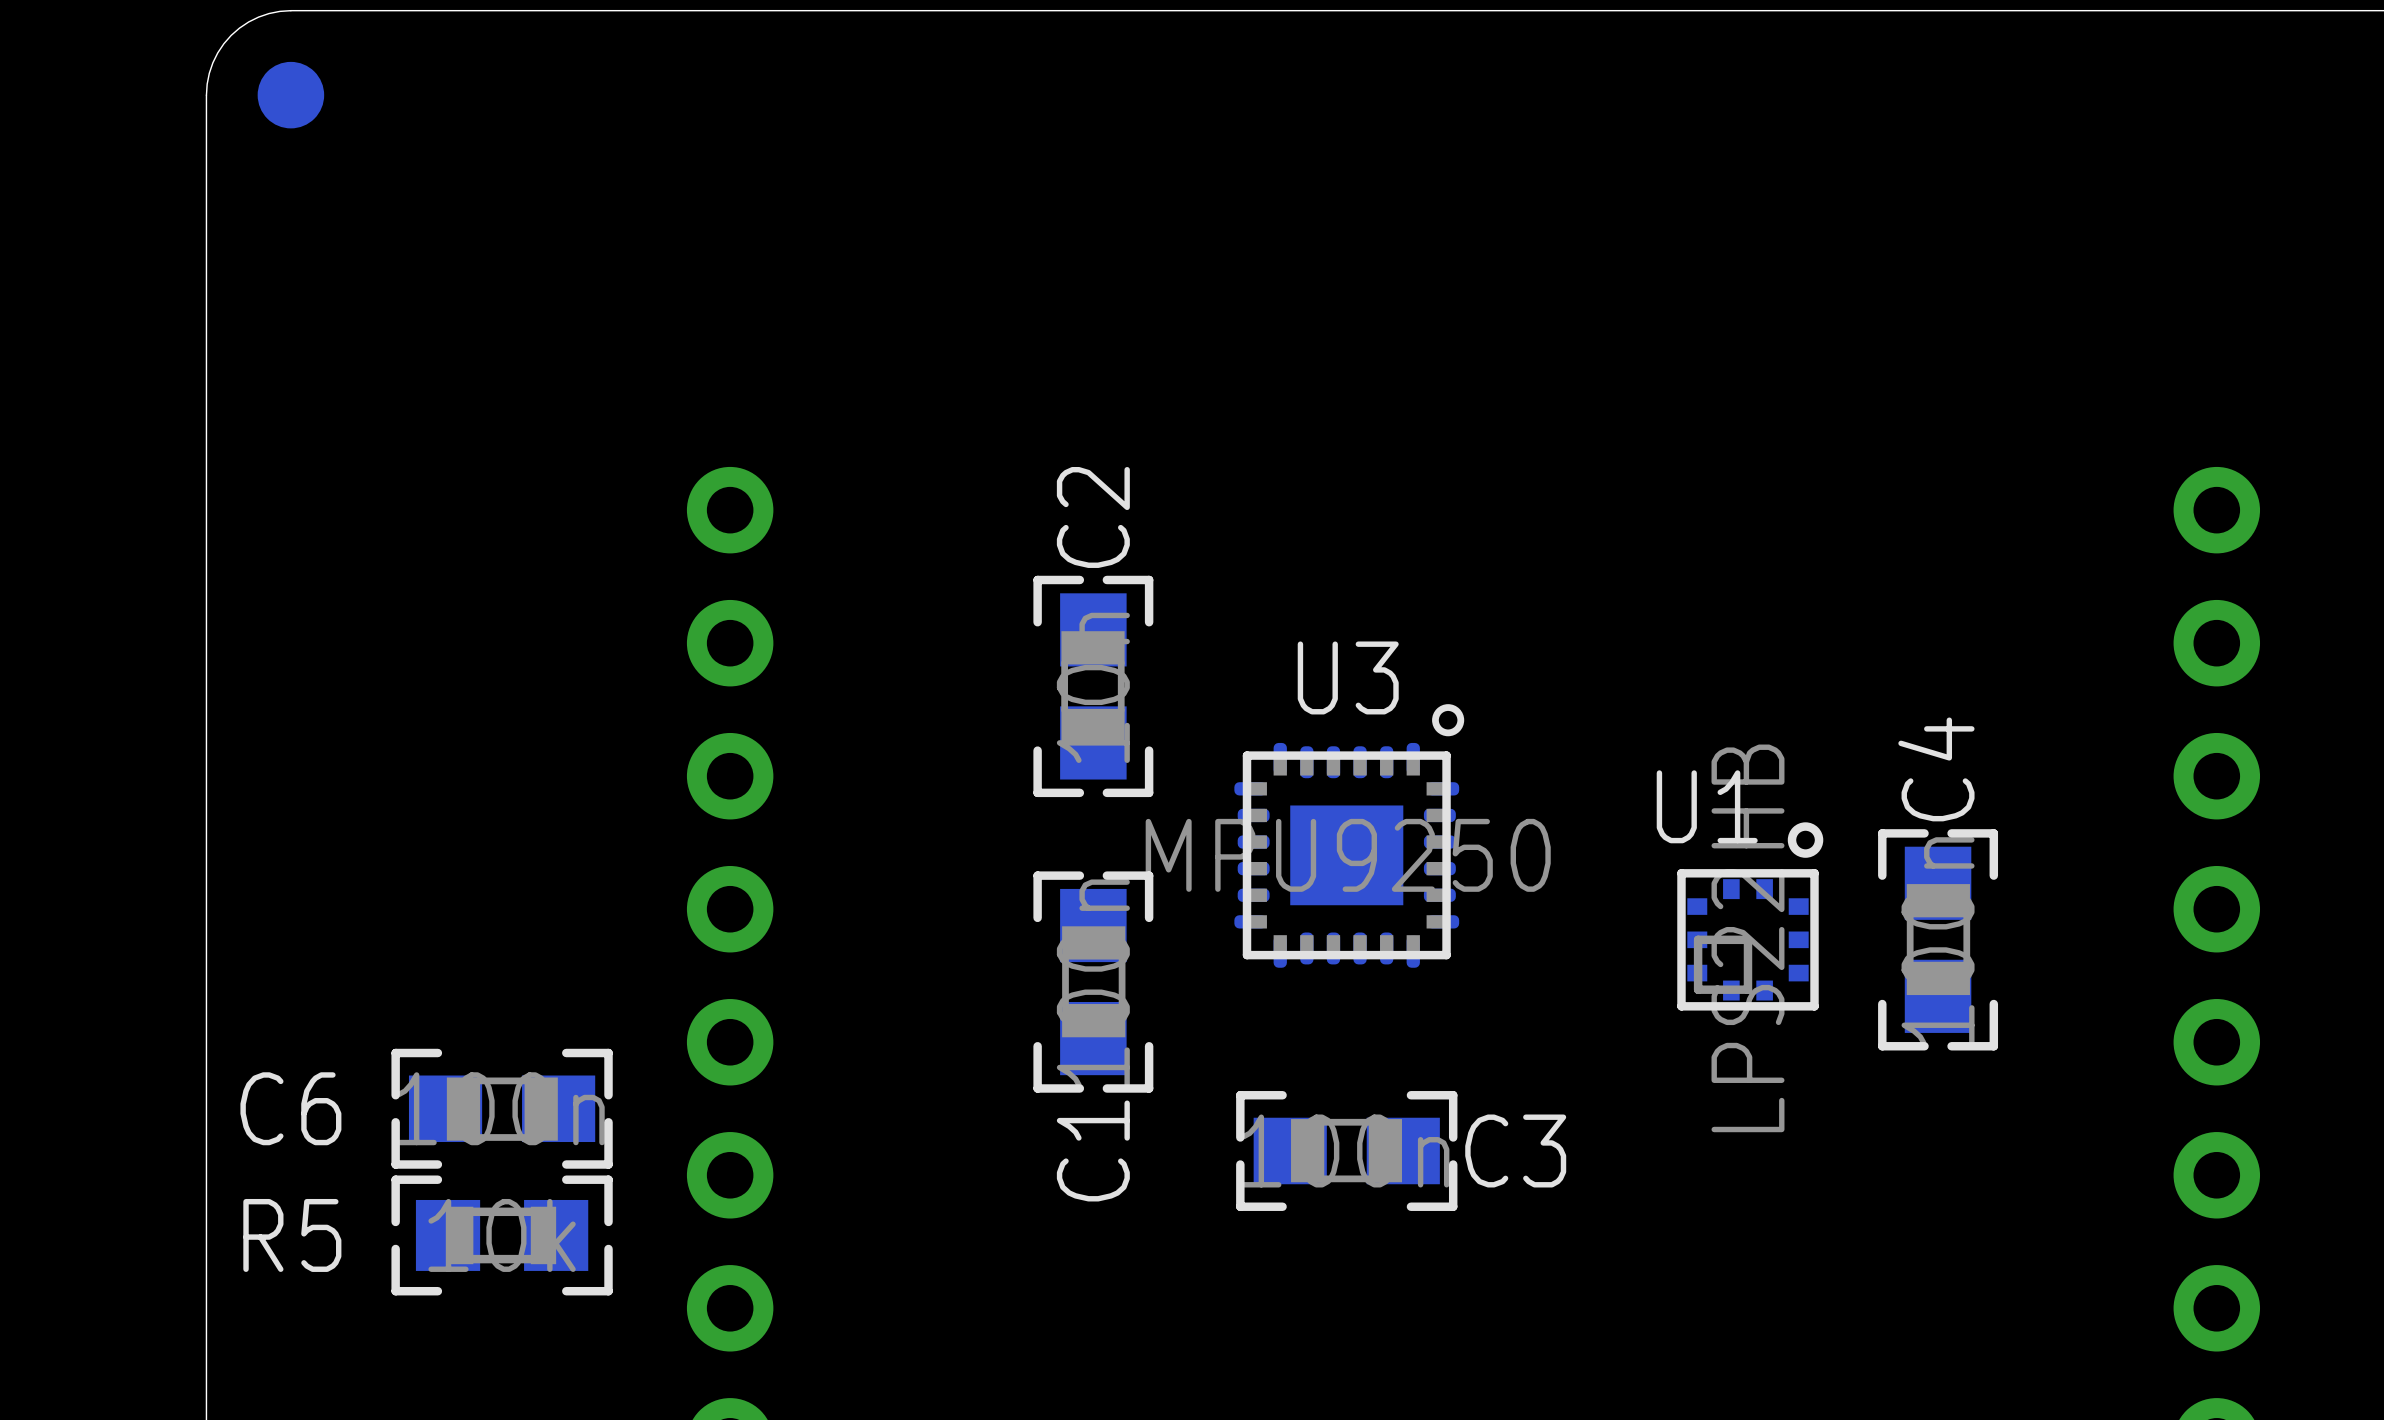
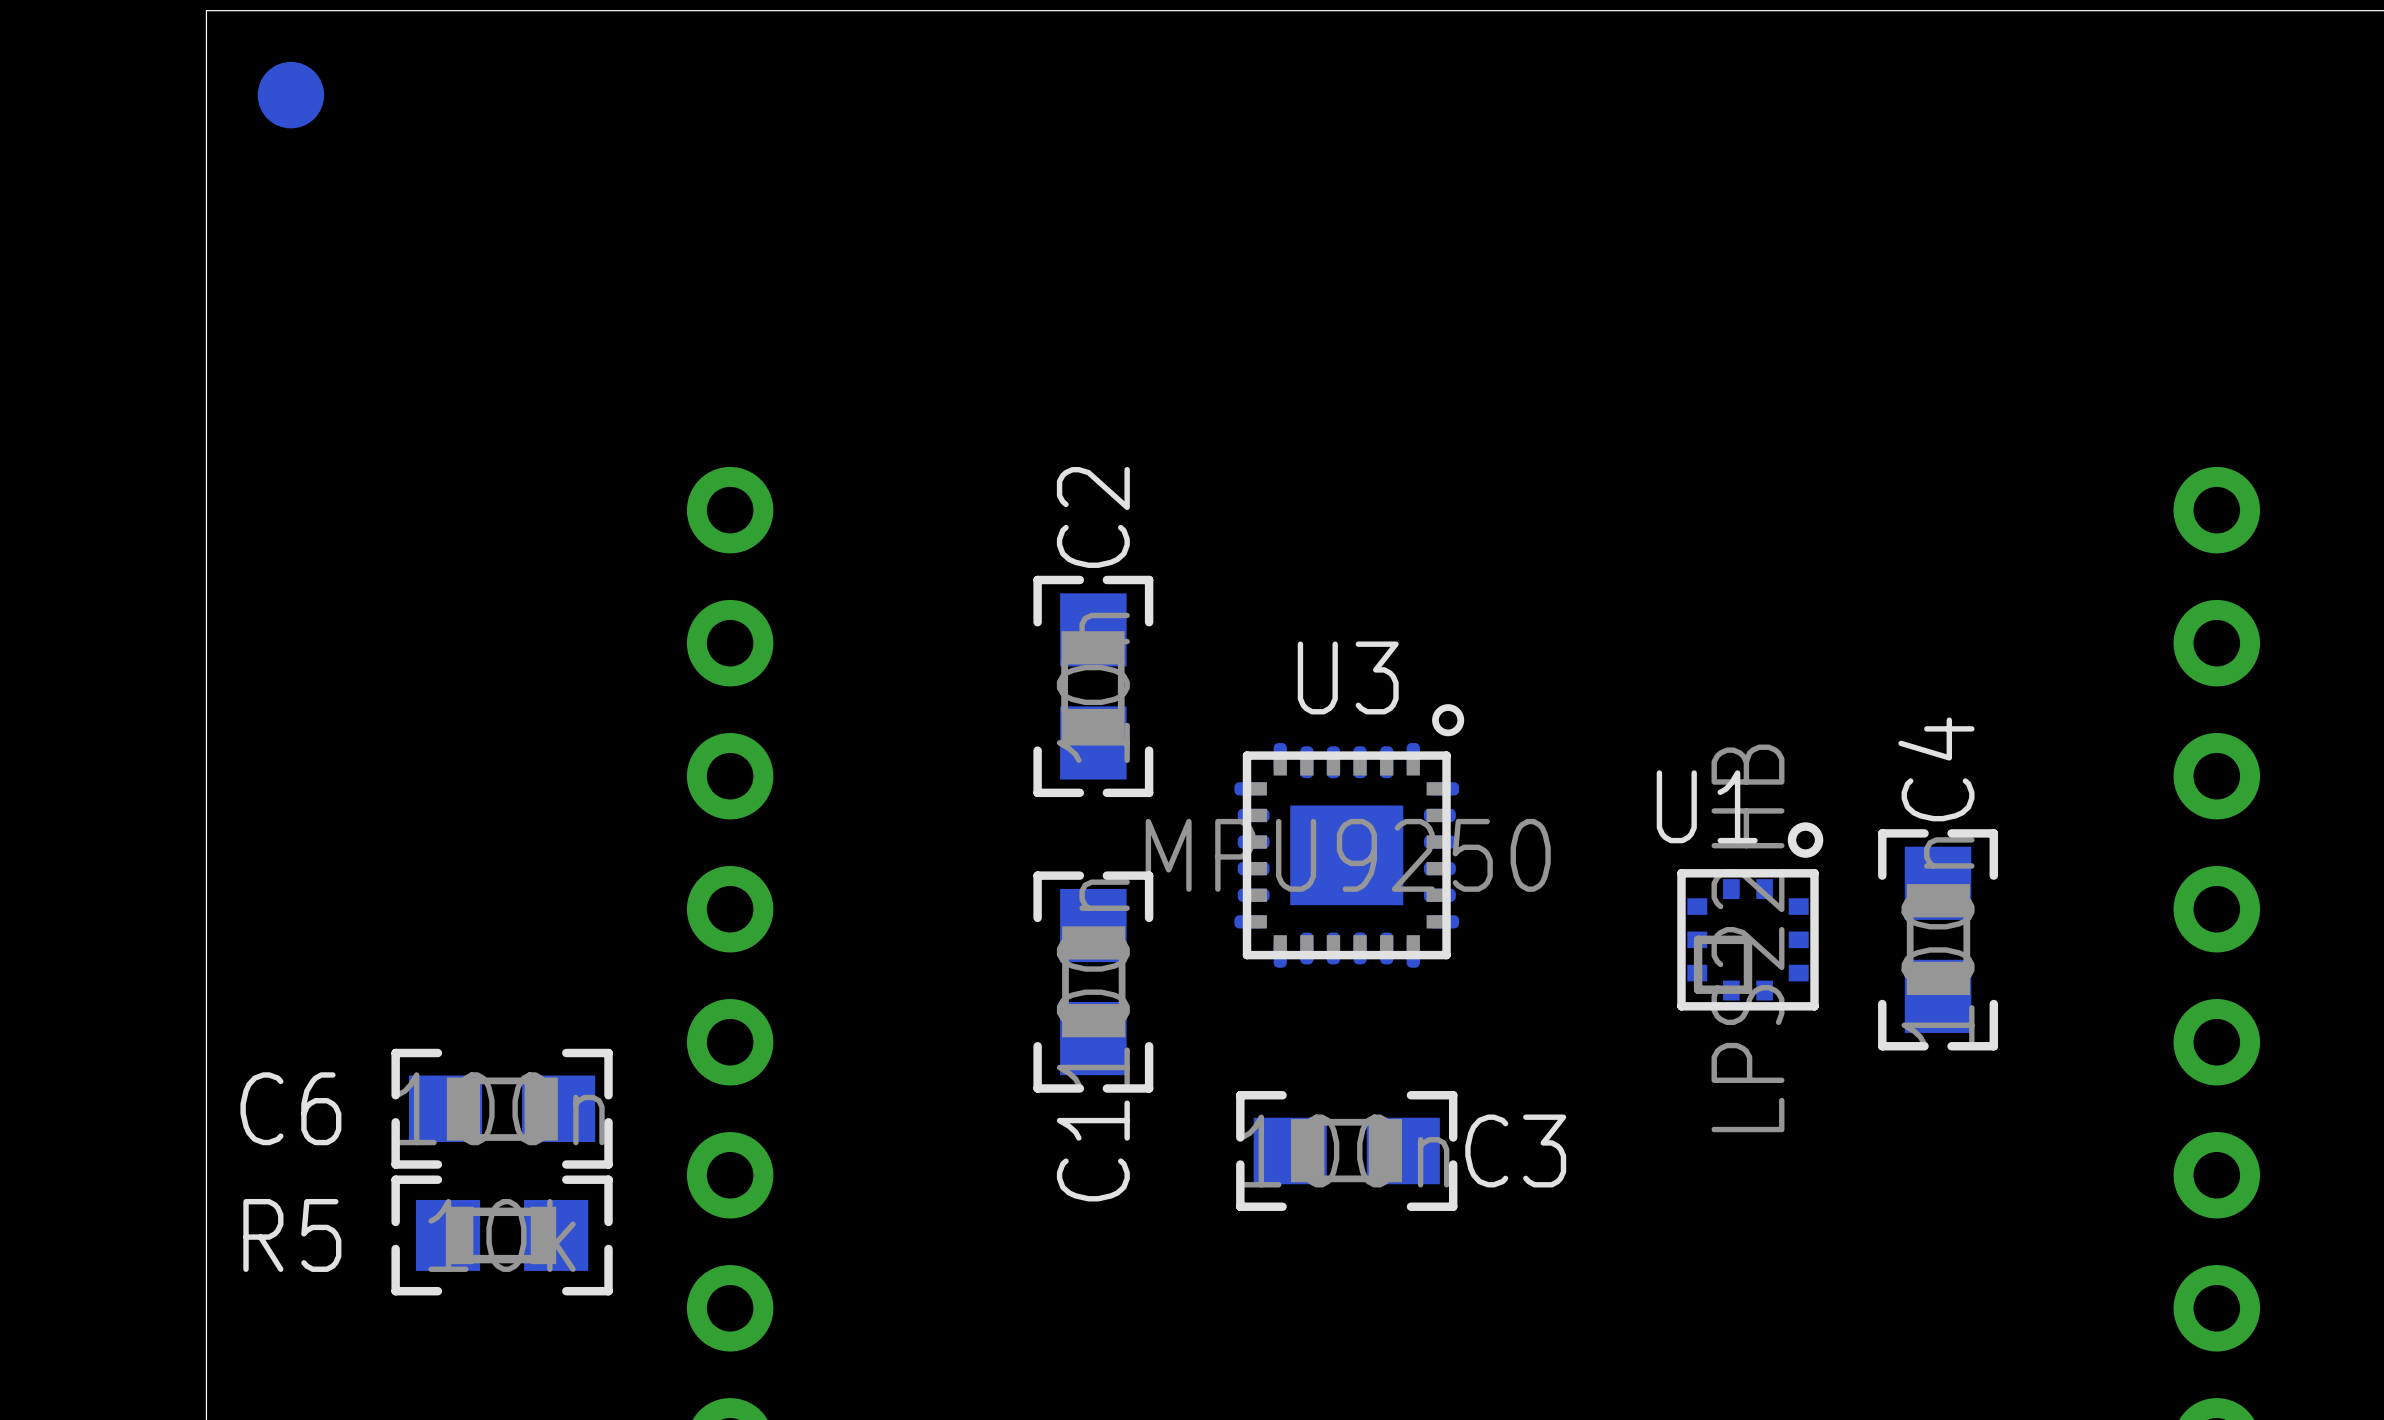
board edge: (290, 10) (258, 17) (231, 35) (212, 62) (206, 95) -> (290, 10) (206, 10) (206, 95)

